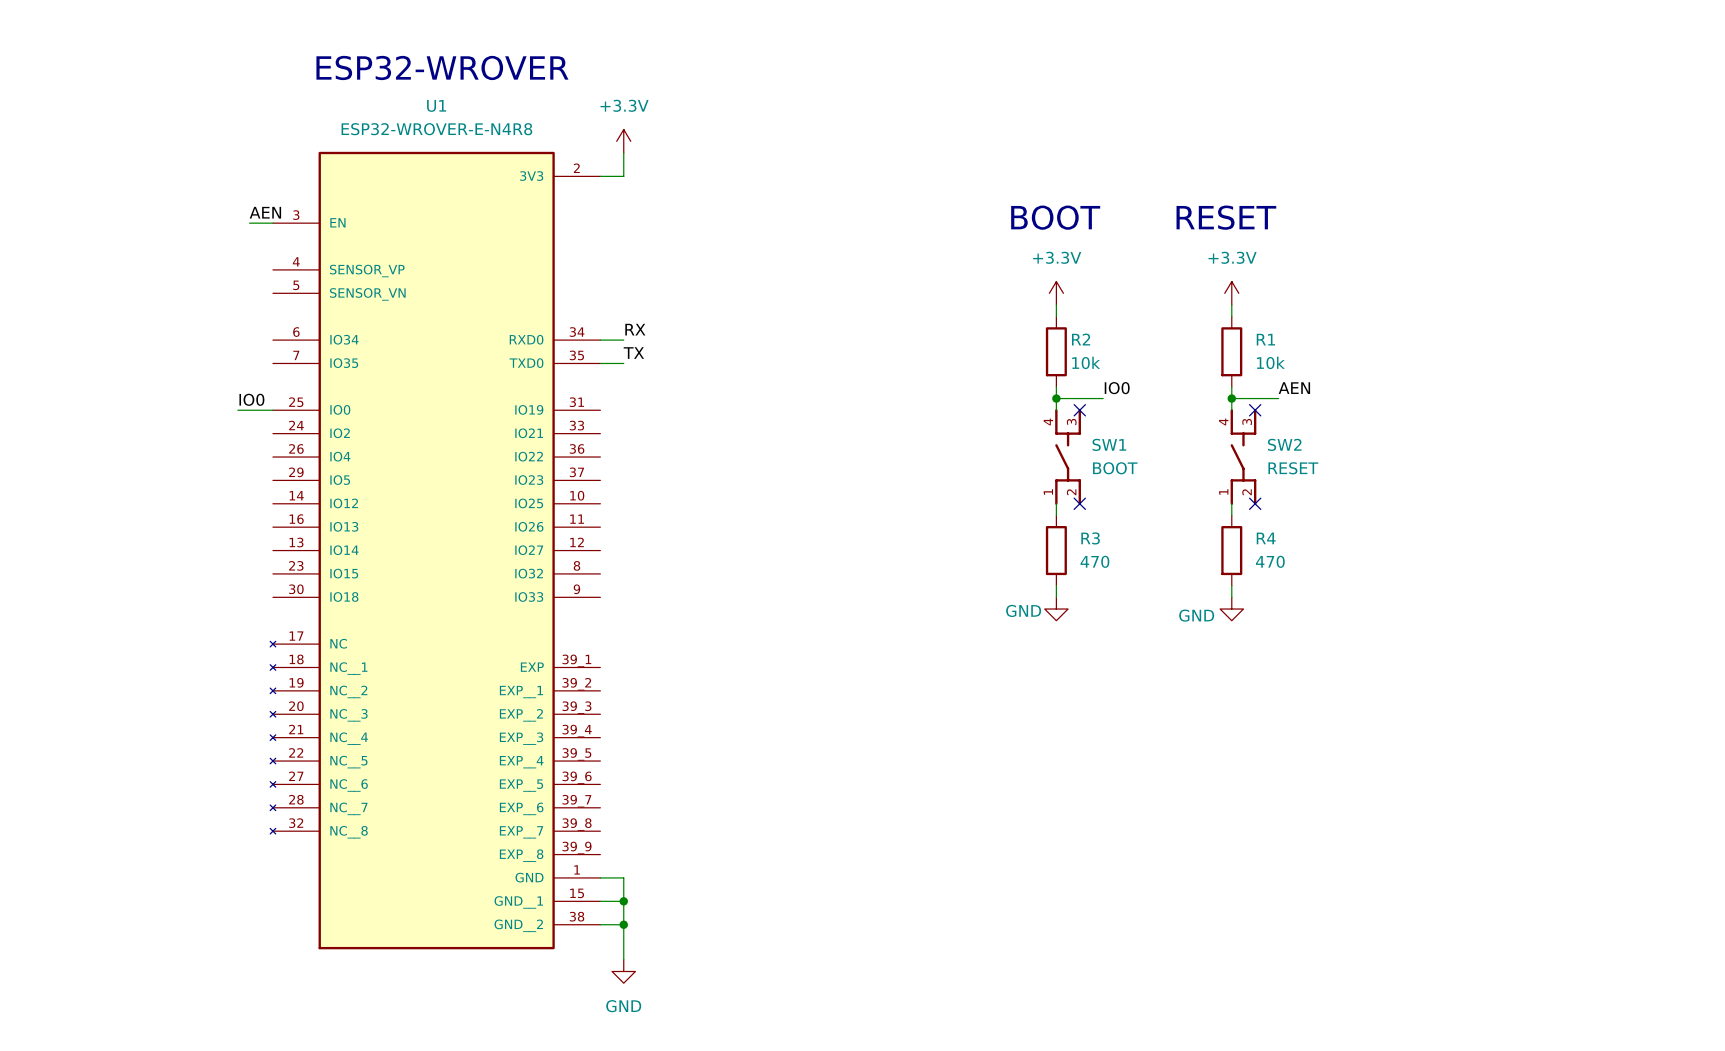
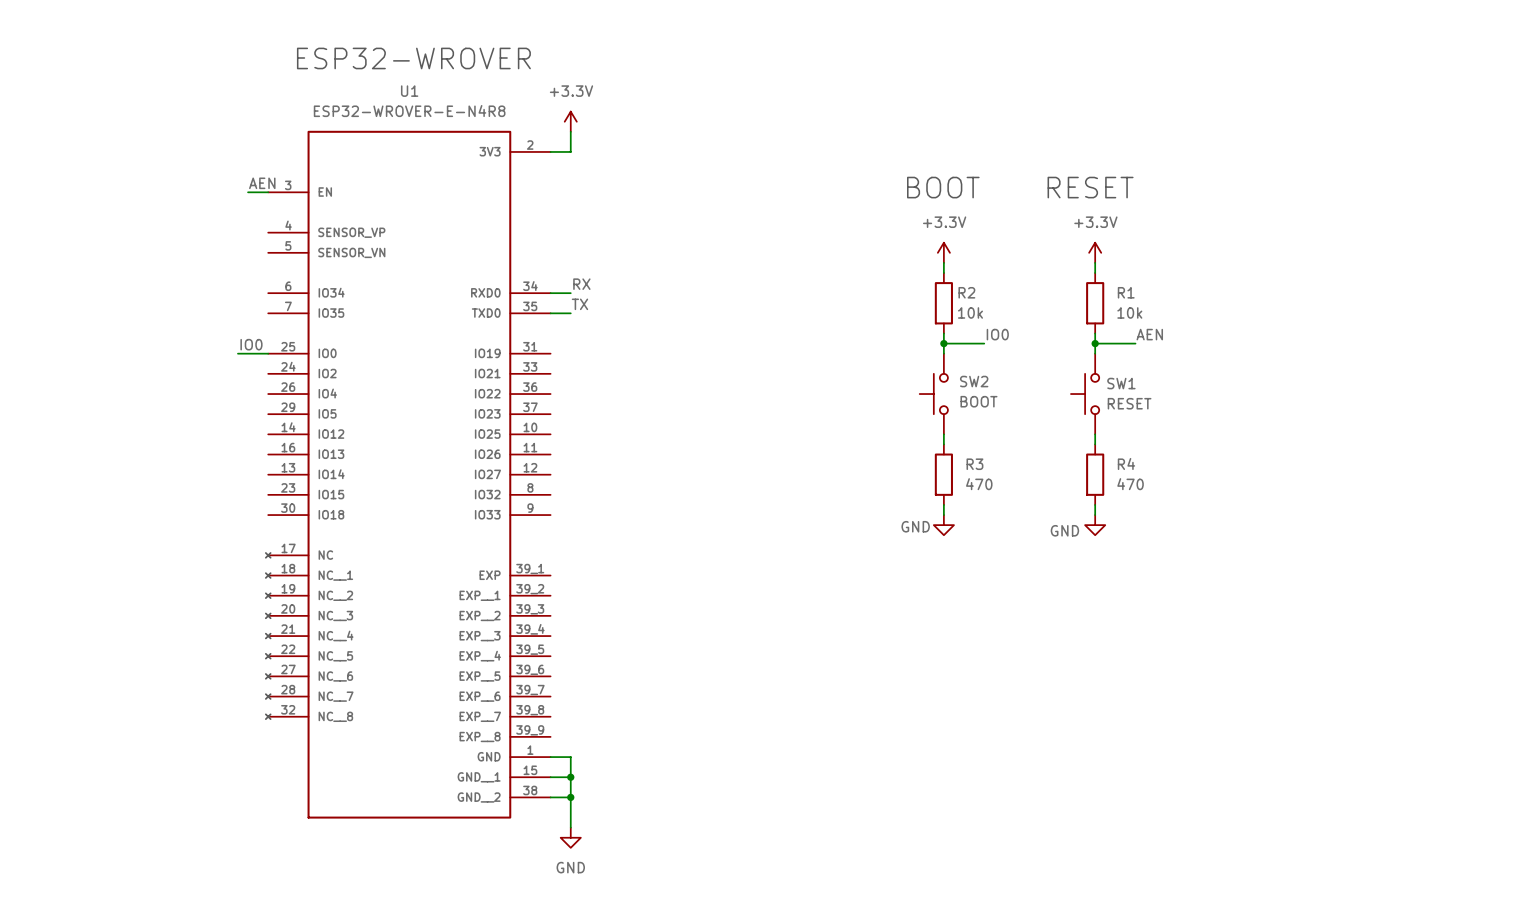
SW1 symbol: [1055, 409, 1081, 505] -> [1070, 353, 1100, 435]
SW2 symbol: [1230, 409, 1257, 505] -> [919, 353, 948, 435]
no-connect mark: (1079, 410) -> none
no-connect mark: (1255, 410) -> none
SW1 value: BOOT (1115, 468) -> RESET (1129, 403)
SW2 value: RESET (1293, 468) -> BOOT (978, 401)
no-connect mark: (1079, 503) -> none
no-connect mark: (1255, 503) -> none

